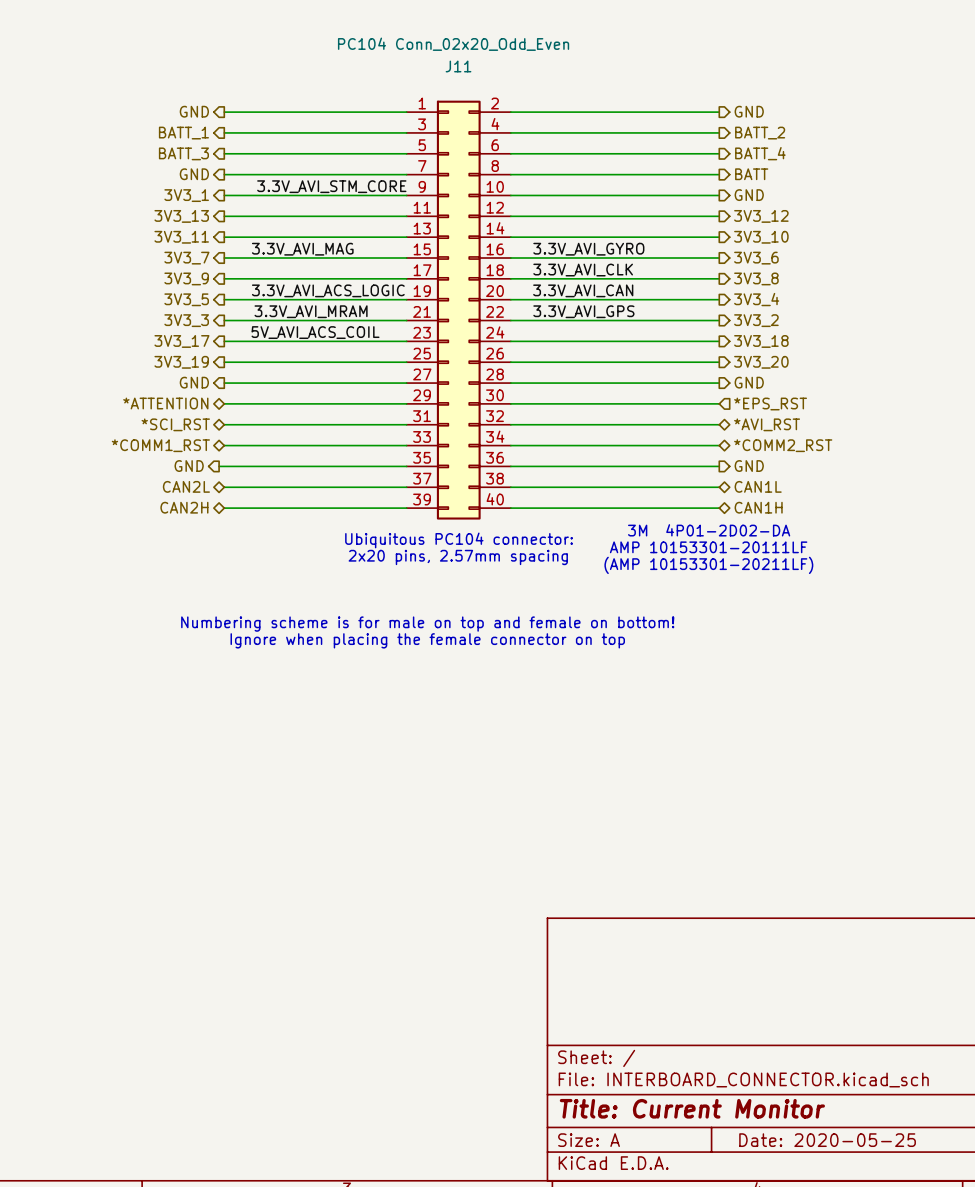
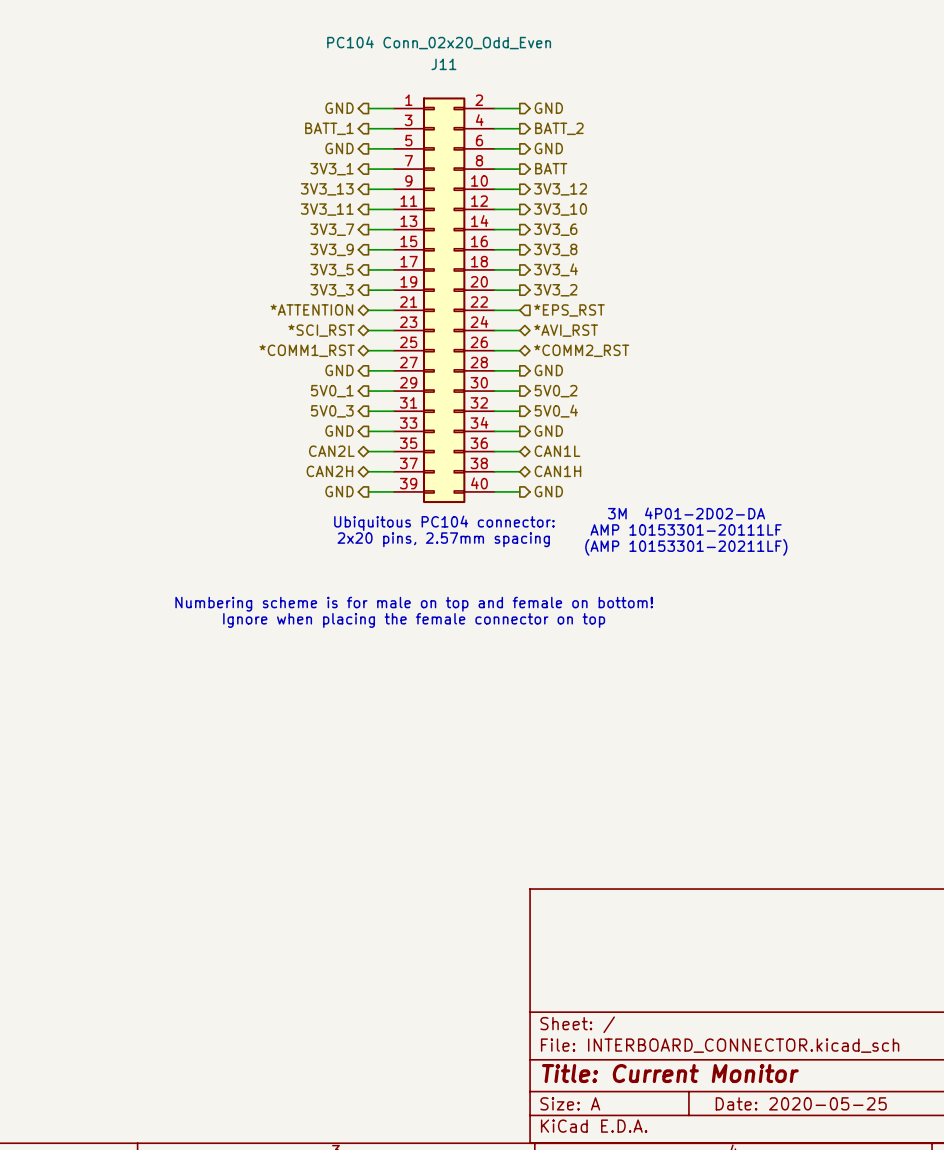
hierarchical label: GND (194, 111) -> none
hierarchical label: none -> GND (339, 108)
hierarchical label: none -> GND (548, 108)
hierarchical label: GND (749, 111) -> none
wire: (224, 112) (380, 112) -> none
wire: (536, 112) (719, 112) -> none
wire: (224, 132) (380, 132) -> none
wire: (536, 132) (719, 132) -> none
hierarchical label position: BATT_1 (183, 133) -> BATT_1 (329, 128)
hierarchical label position: BATT_2 (760, 133) -> BATT_2 (559, 128)
hierarchical label: BATT_3 (183, 153) -> none
wire: (224, 153) (380, 153) -> none
hierarchical label: none -> GND (339, 148)
wire: (536, 153) (719, 153) -> none
hierarchical label: none -> GND (548, 148)
hierarchical label: BATT_4 (760, 153) -> none
hierarchical label: GND (194, 174) -> none
wire: (224, 174) (380, 174) -> none
wire: (536, 174) (719, 174) -> none
hierarchical label position: BATT (751, 174) -> BATT (551, 168)
label: 3.3V_AVI_STM_CORE (331, 186) -> none
hierarchical label position: 3V3_1 (186, 195) -> 3V3_1 (332, 169)
wire: (224, 195) (380, 195) -> none
wire: (536, 195) (719, 195) -> none
hierarchical label: GND (749, 195) -> none
hierarchical label position: 3V3_13 (181, 216) -> 3V3_13 (327, 189)
wire: (224, 216) (380, 216) -> none
wire: (536, 216) (719, 216) -> none
hierarchical label position: 3V3_12 (761, 216) -> 3V3_12 (560, 189)
hierarchical label position: 3V3_11 (181, 237) -> 3V3_11 (327, 209)
wire: (224, 237) (380, 237) -> none
wire: (536, 237) (719, 237) -> none
hierarchical label position: 3V3_10 (761, 237) -> 3V3_10 (560, 209)
label: 3.3V_AVI_MAG (302, 249) -> none
label: 3.3V_AVI_GYRO (588, 249) -> none
hierarchical label position: 3V3_7 (186, 258) -> 3V3_7 (332, 229)
wire: (224, 258) (380, 258) -> none
wire: (536, 258) (719, 258) -> none
hierarchical label position: 3V3_6 (756, 258) -> 3V3_6 (555, 229)
label: 3.3V_AVI_CLK (583, 270) -> none
hierarchical label position: 3V3_9 (186, 278) -> 3V3_9 (332, 249)
wire: (224, 278) (380, 278) -> none
wire: (536, 278) (719, 278) -> none
hierarchical label position: 3V3_8 (756, 278) -> 3V3_8 (555, 249)
label: 3.3V_AVI_ACS_LOGIC (328, 290) -> none
label: 3.3V_AVI_CAN (583, 290) -> none
hierarchical label position: 3V3_5 (186, 299) -> 3V3_5 (332, 270)
wire: (224, 299) (380, 299) -> none
wire: (536, 299) (719, 299) -> none
hierarchical label position: 3V3_4 (756, 299) -> 3V3_4 (556, 269)
label: 3.3V_AVI_MRAM (311, 311) -> none
label: 3.3V_AVI_GPS (583, 311) -> none
hierarchical label position: 3V3_3 (186, 320) -> 3V3_3 (332, 290)
wire: (224, 320) (380, 320) -> none
wire: (536, 320) (719, 320) -> none
hierarchical label position: 3V3_2 (756, 320) -> 3V3_2 (555, 290)
label: 5V_AVI_ACS_COIL (315, 332) -> none
hierarchical label: 3V3_17 (181, 341) -> none
wire: (224, 341) (380, 341) -> none
wire: (536, 341) (719, 341) -> none
hierarchical label: 3V3_18 (761, 341) -> none
hierarchical label: 3V3_19 (181, 362) -> none
wire: (224, 362) (380, 362) -> none
wire: (536, 362) (719, 362) -> none
hierarchical label: 3V3_20 (761, 362) -> none
hierarchical label: GND (194, 382) -> none
hierarchical label: none -> GND (339, 370)
hierarchical label: none -> GND (548, 370)
hierarchical label: GND (749, 382) -> none
wire: (224, 383) (380, 383) -> none
wire: (536, 383) (719, 383) -> none
hierarchical label position: *ATTENTION (165, 403) -> *ATTENTION (311, 309)
wire: (224, 403) (380, 403) -> none
wire: (536, 403) (719, 403) -> none
hierarchical label: none -> 5V0_1 (332, 391)
hierarchical label: none -> 5V0_2 (556, 391)
hierarchical label position: *EPS_RST (770, 404) -> *EPS_RST (569, 310)
hierarchical label position: *SCI_RST (175, 424) -> *SCI_RST (321, 330)
wire: (224, 424) (380, 424) -> none
hierarchical label: none -> 5V0_3 (332, 411)
wire: (536, 424) (719, 424) -> none
hierarchical label: none -> 5V0_4 (556, 411)
hierarchical label position: *AVI_RST (767, 424) -> *AVI_RST (566, 330)
hierarchical label position: *COMM1_RST (160, 445) -> *COMM1_RST (307, 350)
wire: (224, 445) (380, 445) -> none
hierarchical label: none -> GND (339, 431)
wire: (536, 445) (719, 445) -> none
hierarchical label: none -> GND (548, 431)
hierarchical label position: *COMM2_RST (783, 445) -> *COMM2_RST (581, 350)
hierarchical label: GND (189, 466) -> none
wire: (219, 466) (380, 466) -> none
wire: (536, 466) (719, 466) -> none
hierarchical label: GND (749, 466) -> none
hierarchical label position: CAN2L (186, 486) -> CAN2L (331, 451)
hierarchical label position: CAN1L (758, 486) -> CAN1L (557, 451)
wire: (224, 487) (380, 487) -> none
wire: (536, 487) (719, 487) -> none
hierarchical label position: CAN2H (184, 507) -> CAN2H (329, 471)
hierarchical label: none -> GND (339, 491)
hierarchical label: none -> GND (548, 491)
hierarchical label position: CAN1H (758, 507) -> CAN1H (557, 471)
wire: (224, 508) (380, 508) -> none
wire: (536, 508) (719, 508) -> none

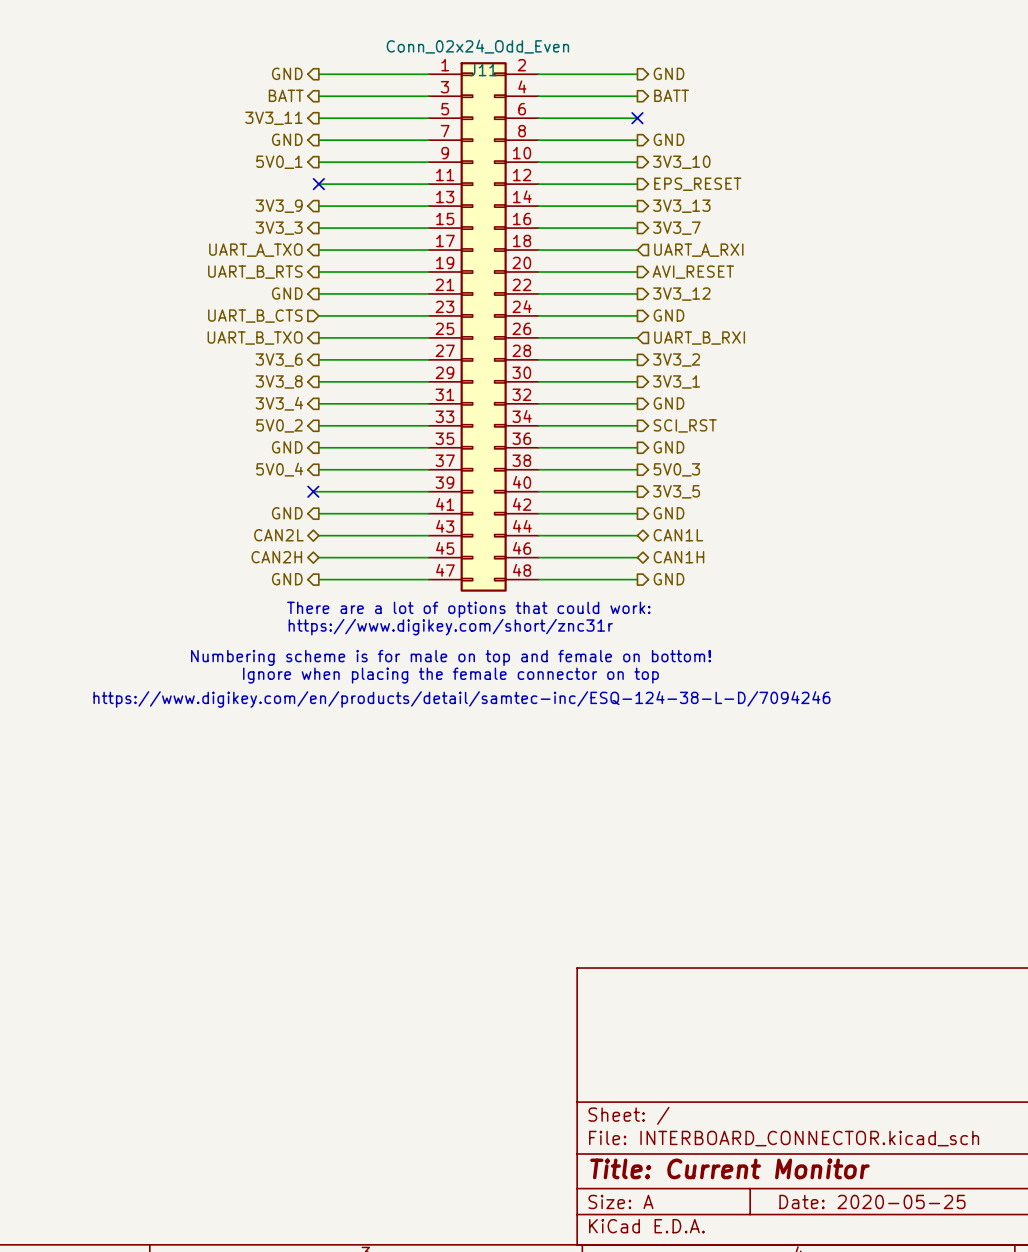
J11 value: PC104 Conn_02x20_Odd_Even (439, 42) -> Conn_02x24_Odd_Even (477, 46)
hierarchical label: none -> GND (287, 73)
hierarchical label: none -> GND (669, 73)
wire: none -> (318, 74) (428, 74)
wire: none -> (538, 74) (637, 74)
hierarchical label: none -> BATT (286, 95)
wire: none -> (318, 96) (428, 96)
wire: none -> (538, 96) (637, 96)
J11 symbol: [393, 97, 495, 504] -> [428, 62, 539, 592]
wire: none -> (318, 118) (401, 118)
hierarchical label: GND (339, 108) -> none
wire: none -> (566, 118) (637, 118)
hierarchical label: GND (548, 108) -> none
no-connect mark: none -> (637, 118)
hierarchical label: none -> GND (287, 139)
wire: none -> (318, 140) (401, 140)
hierarchical label: BATT_1 (329, 128) -> none
wire: none -> (566, 140) (637, 140)
hierarchical label: BATT_2 (559, 128) -> none
hierarchical label: none -> GND (669, 139)
wire: none -> (318, 162) (401, 162)
hierarchical label: GND (339, 148) -> none
wire: none -> (566, 162) (637, 162)
hierarchical label: GND (548, 148) -> none
hierarchical label: none -> 5V0_1 (279, 162)
hierarchical label position: BATT (551, 168) -> BATT (671, 95)
wire: none -> (318, 184) (401, 184)
no-connect mark: none -> (318, 184)
hierarchical label: 3V3_1 (332, 169) -> none
wire: none -> (566, 184) (637, 184)
hierarchical label: none -> EPS_RESET (697, 184)
wire: none -> (318, 206) (401, 206)
hierarchical label: 3V3_13 (327, 189) -> none
wire: none -> (566, 206) (637, 206)
hierarchical label position: 3V3_12 (560, 189) -> 3V3_12 (681, 294)
hierarchical label: none -> 3V3_13 (681, 206)
wire: none -> (318, 228) (401, 228)
hierarchical label position: 3V3_11 (327, 209) -> 3V3_11 (273, 118)
wire: none -> (566, 228) (637, 228)
hierarchical label position: 3V3_10 (560, 209) -> 3V3_10 (681, 162)
hierarchical label: none -> 3V3_7 (676, 228)
hierarchical label: none -> UART_A_TXO (255, 250)
wire: none -> (318, 250) (401, 250)
hierarchical label: 3V3_7 (332, 229) -> none
wire: none -> (566, 250) (637, 250)
hierarchical label: 3V3_6 (555, 229) -> none
hierarchical label: none -> UART_A_RXI (698, 250)
hierarchical label: none -> UART_B_RTS (255, 272)
wire: none -> (318, 271) (401, 271)
hierarchical label position: 3V3_9 (332, 249) -> 3V3_9 (279, 206)
wire: none -> (566, 271) (637, 271)
hierarchical label: 3V3_8 (555, 249) -> none
hierarchical label: none -> AVI_RESET (693, 272)
hierarchical label: none -> GND (287, 293)
wire: none -> (318, 293) (401, 293)
wire: none -> (566, 293) (637, 293)
hierarchical label: 3V3_4 (556, 269) -> none
hierarchical label: 3V3_5 (332, 270) -> none
hierarchical label: none -> GND (669, 315)
hierarchical label: none -> UART_B_CTS (255, 316)
wire: none -> (318, 315) (401, 315)
hierarchical label position: 3V3_3 (332, 290) -> 3V3_3 (279, 228)
wire: none -> (566, 315) (637, 315)
hierarchical label position: 3V3_2 (555, 290) -> 3V3_2 (676, 360)
hierarchical label: *ATTENTION (311, 309) -> none
hierarchical label: none -> UART_B_TXO (255, 338)
wire: none -> (318, 337) (401, 337)
wire: none -> (566, 337) (637, 337)
hierarchical label: *EPS_RST (569, 310) -> none
hierarchical label: none -> UART_B_RXI (699, 338)
hierarchical label: none -> 3V3_6 (279, 360)
wire: none -> (318, 359) (401, 359)
hierarchical label: *SCI_RST (321, 330) -> none
wire: none -> (566, 359) (637, 359)
hierarchical label: *AVI_RST (566, 330) -> none
hierarchical label: none -> 3V3_8 (279, 381)
wire: none -> (318, 381) (401, 381)
hierarchical label: *COMM1_RST (307, 350) -> none
wire: none -> (566, 381) (637, 381)
hierarchical label: *COMM2_RST (581, 350) -> none
hierarchical label: none -> 3V3_1 (676, 381)
hierarchical label: none -> 3V3_4 (279, 403)
wire: none -> (318, 403) (401, 403)
hierarchical label: GND (339, 370) -> none
wire: none -> (566, 403) (637, 403)
hierarchical label: GND (548, 370) -> none
hierarchical label: none -> GND (669, 403)
hierarchical label: none -> 5V0_2 (279, 425)
wire: none -> (318, 425) (401, 425)
hierarchical label: 5V0_1 (332, 391) -> none
wire: none -> (566, 425) (637, 425)
hierarchical label: 5V0_2 (556, 391) -> none
hierarchical label: none -> SCI_RST (685, 425)
hierarchical label: none -> GND (287, 447)
hierarchical label: none -> GND (669, 447)
wire: none -> (318, 447) (401, 447)
hierarchical label: 5V0_3 (332, 411) -> none
wire: none -> (566, 447) (637, 447)
hierarchical label: 5V0_4 (556, 411) -> none
hierarchical label: none -> 5V0_4 (279, 469)
wire: none -> (318, 469) (401, 469)
hierarchical label: GND (339, 431) -> none
wire: none -> (566, 469) (637, 469)
hierarchical label: GND (548, 431) -> none
hierarchical label: none -> 5V0_3 (676, 469)
wire: none -> (313, 491) (401, 491)
no-connect mark: none -> (313, 491)
hierarchical label position: CAN2L (331, 451) -> CAN2L (278, 535)
wire: none -> (566, 491) (637, 491)
hierarchical label position: CAN1L (557, 451) -> CAN1L (678, 535)
hierarchical label: none -> 3V3_5 (676, 491)
hierarchical label: none -> GND (287, 513)
wire: none -> (318, 513) (401, 513)
hierarchical label position: CAN2H (329, 471) -> CAN2H (276, 557)
wire: none -> (566, 513) (637, 513)
hierarchical label position: CAN1H (557, 471) -> CAN1H (678, 557)
hierarchical label: none -> GND (669, 513)
wire: none -> (318, 535) (401, 535)
hierarchical label: GND (339, 491) -> none
wire: none -> (566, 535) (637, 535)
hierarchical label: GND (548, 491) -> none
wire: none -> (318, 557) (428, 557)
wire: none -> (538, 557) (637, 557)
text: 3M 4P01-2D02-DA (686, 513) -> none
text: Ubiquitous PC104 connector: (444, 523) -> none
text: AMP 10153301-20111LF (686, 529) -> none
hierarchical label: none -> GND (287, 579)
hierarchical label: none -> GND (669, 579)
wire: none -> (318, 579) (428, 579)
wire: none -> (538, 579) (637, 579)
text: 2x20 pins, 2.57mm spacing (443, 539) -> none
text: (AMP 10153301-20211LF) (686, 547) -> none
text: none -> There are a lot of options that could work: (468, 609)
text: none -> https://www.digikey.com/short/znc31r (450, 627)
text: none -> https://www.digikey.com/en/products/detail/samtec-inc/ESQ-124-38-L-D/7094246 (461, 699)

